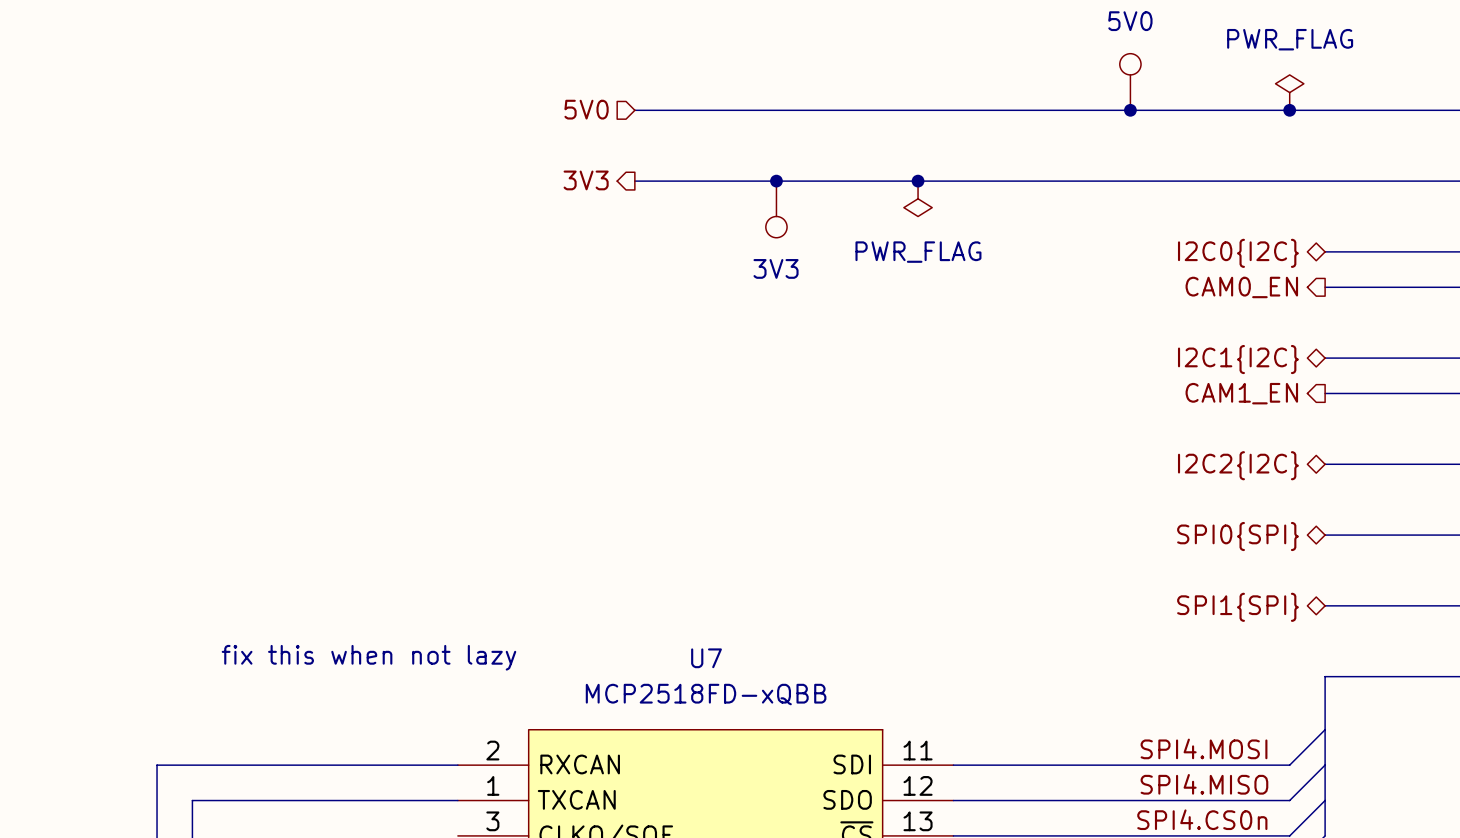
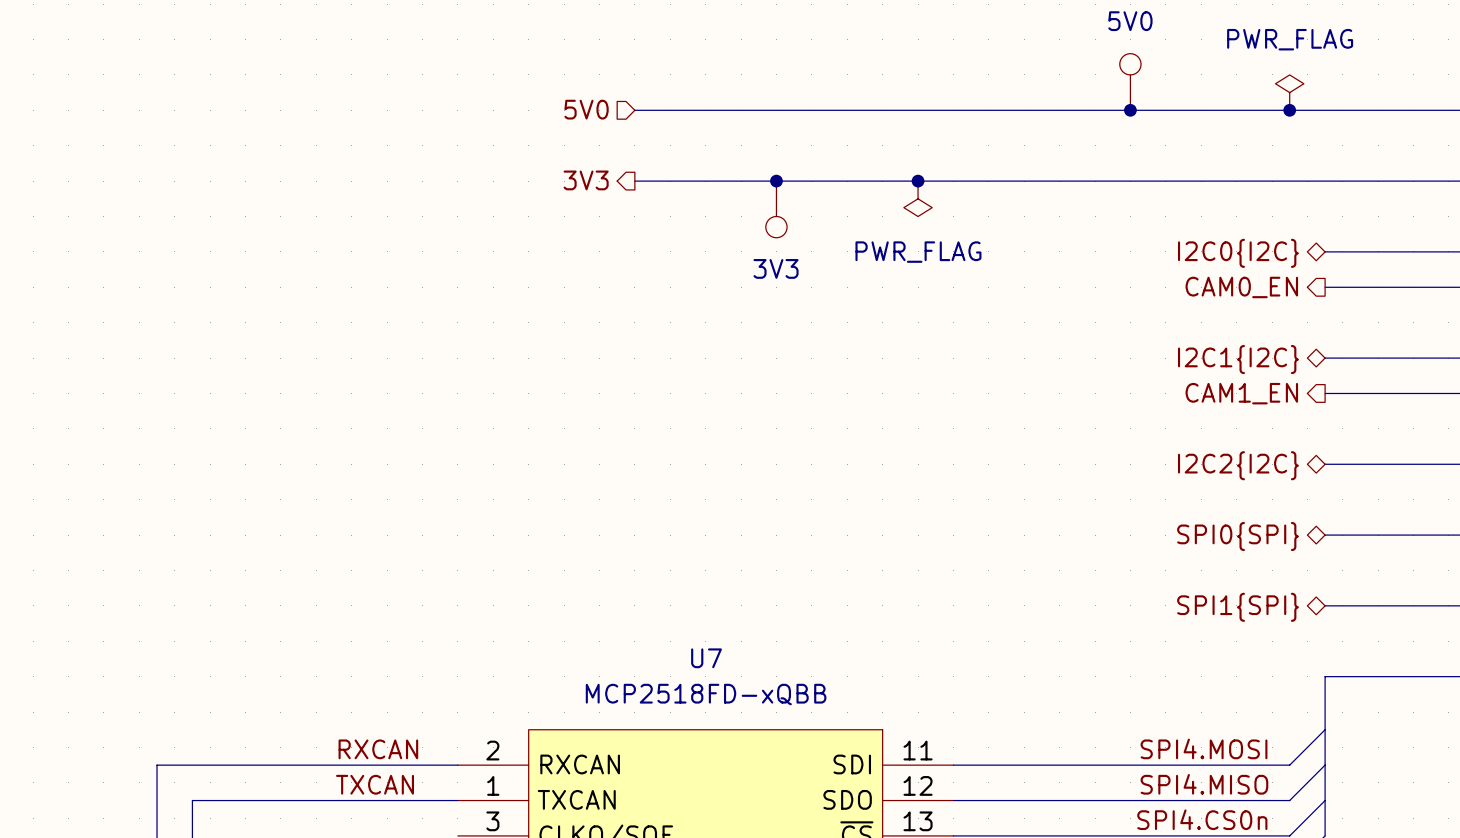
text: fix this when not lazy (368, 657) -> none
label: none -> RXCAN (378, 749)
label: none -> TXCAN (375, 784)

